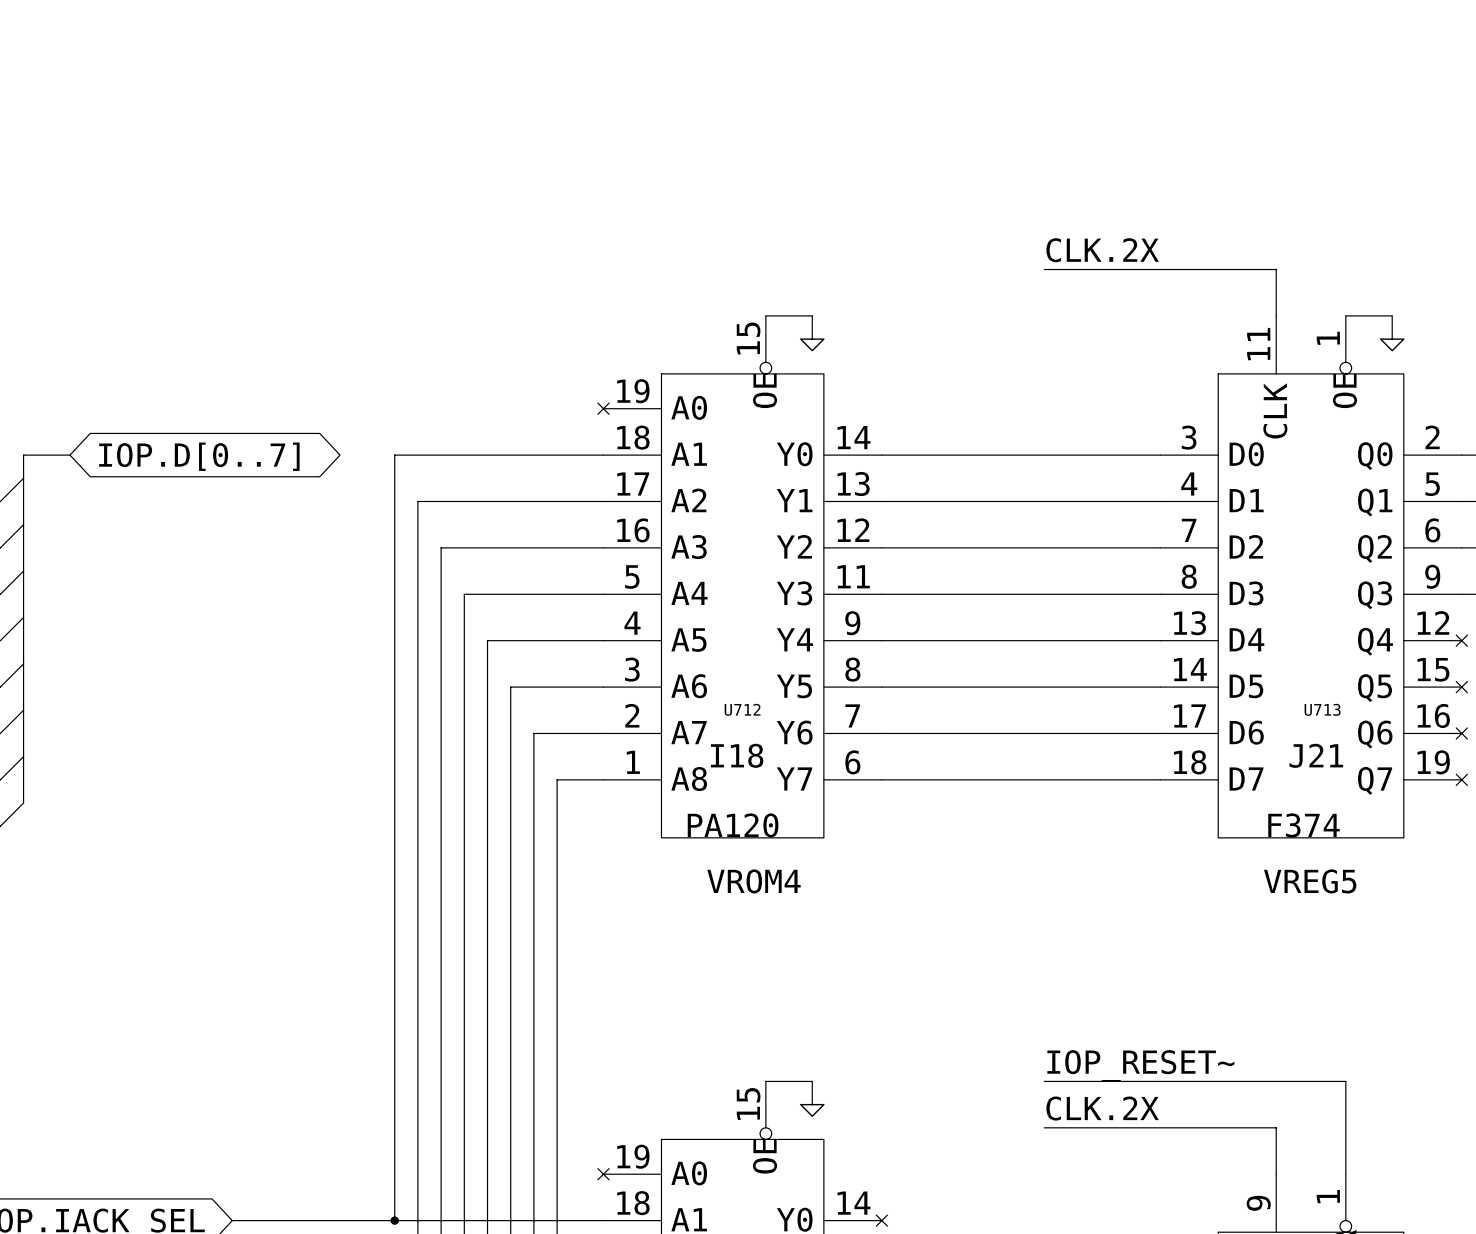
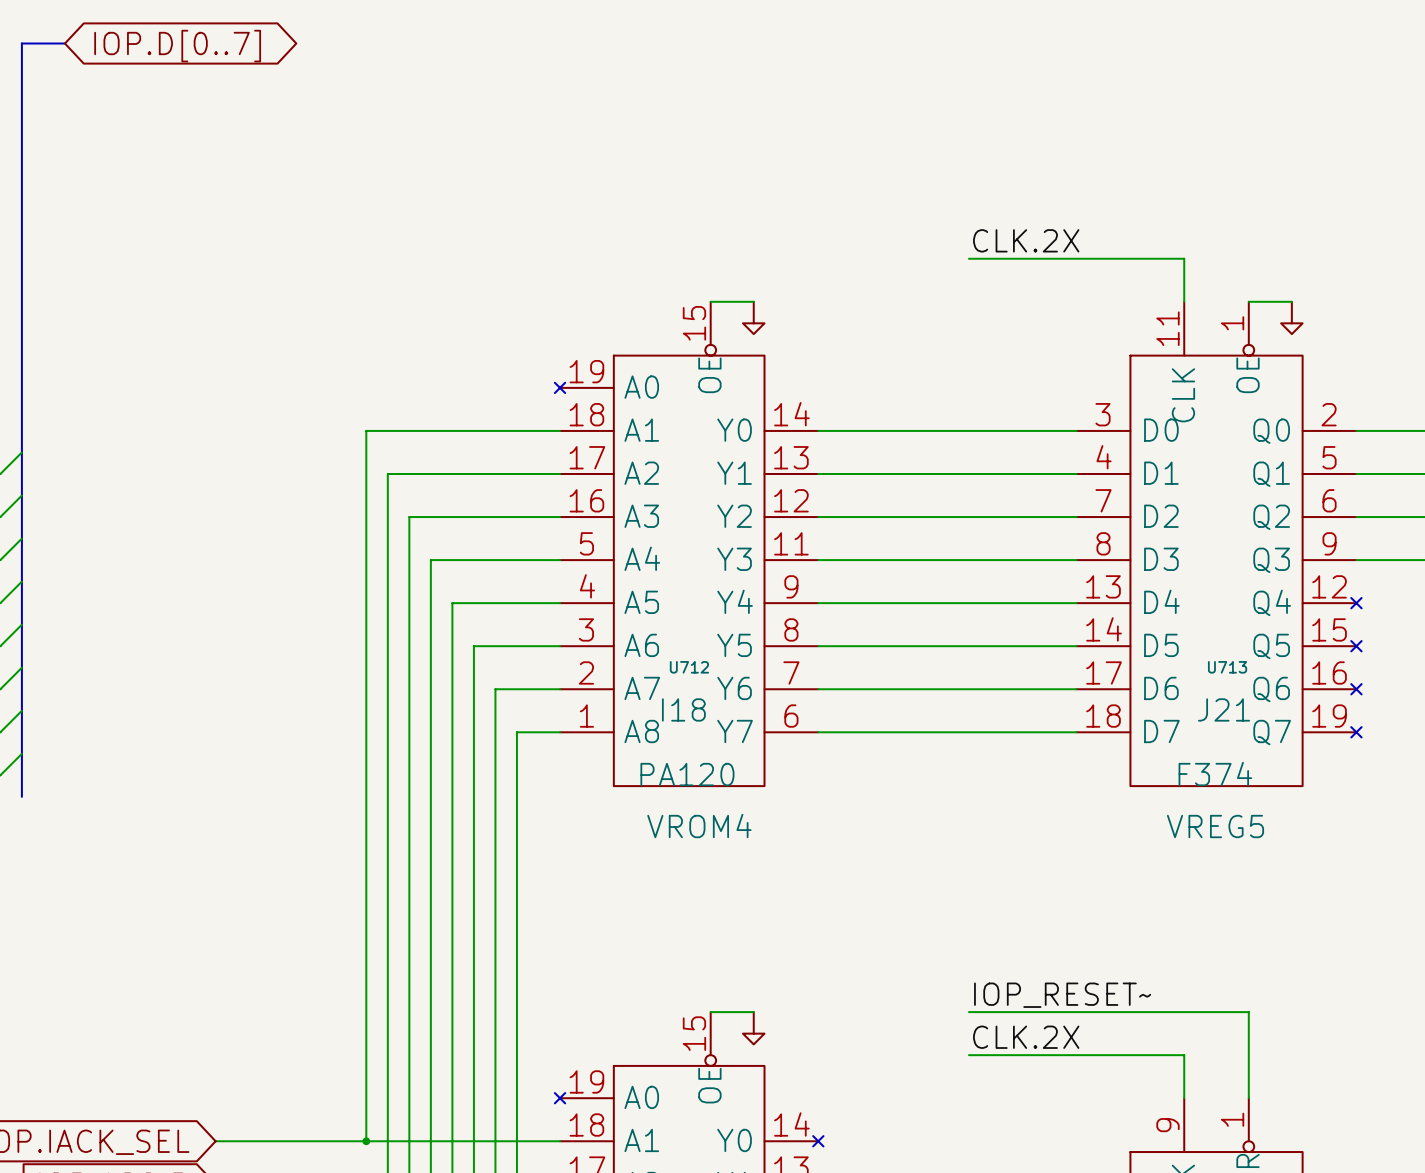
global label: none -> IOP.D[0..7] (177, 46)
bus: (23, 455) (69, 455) -> (21, 430) (21, 43) (64, 43)
global label: IOP.D[0..7] (199, 456) -> none
bus: none -> (21, 753) (21, 796)

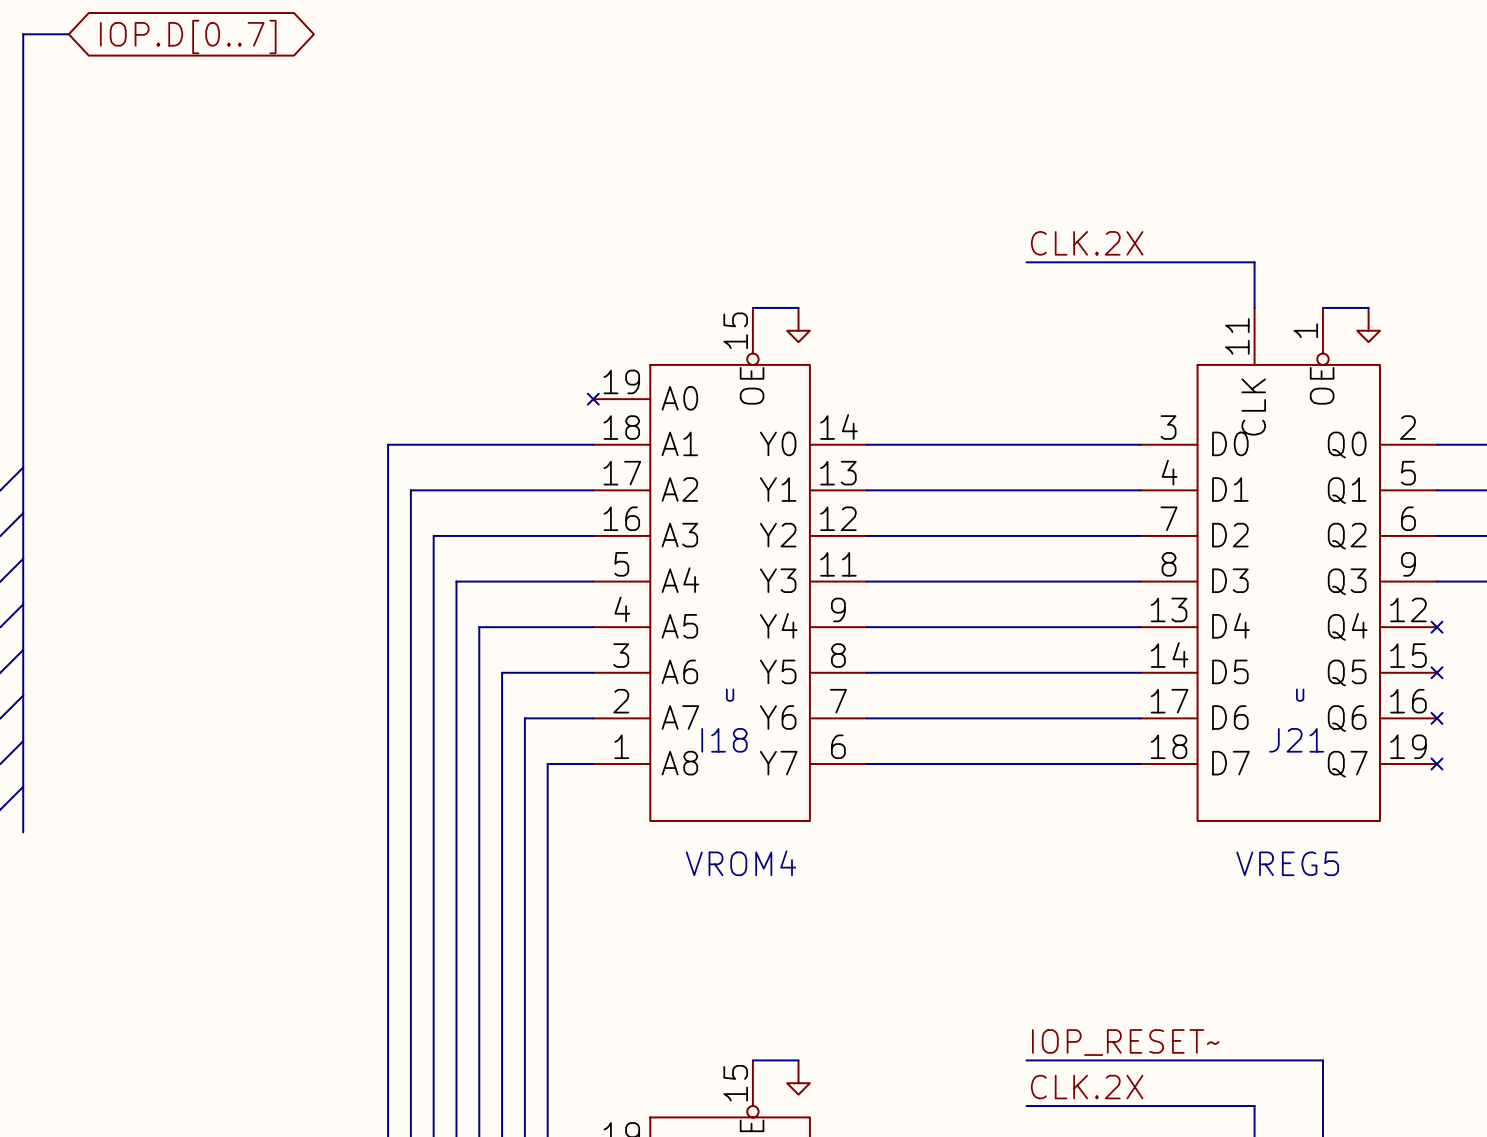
U712 name: U712 (689, 667) -> U (730, 695)
U713 name: U713 (1227, 667) -> U (1300, 695)
U712 value: PA120 (687, 774) -> none
U713 value: F374 (1215, 774) -> none

